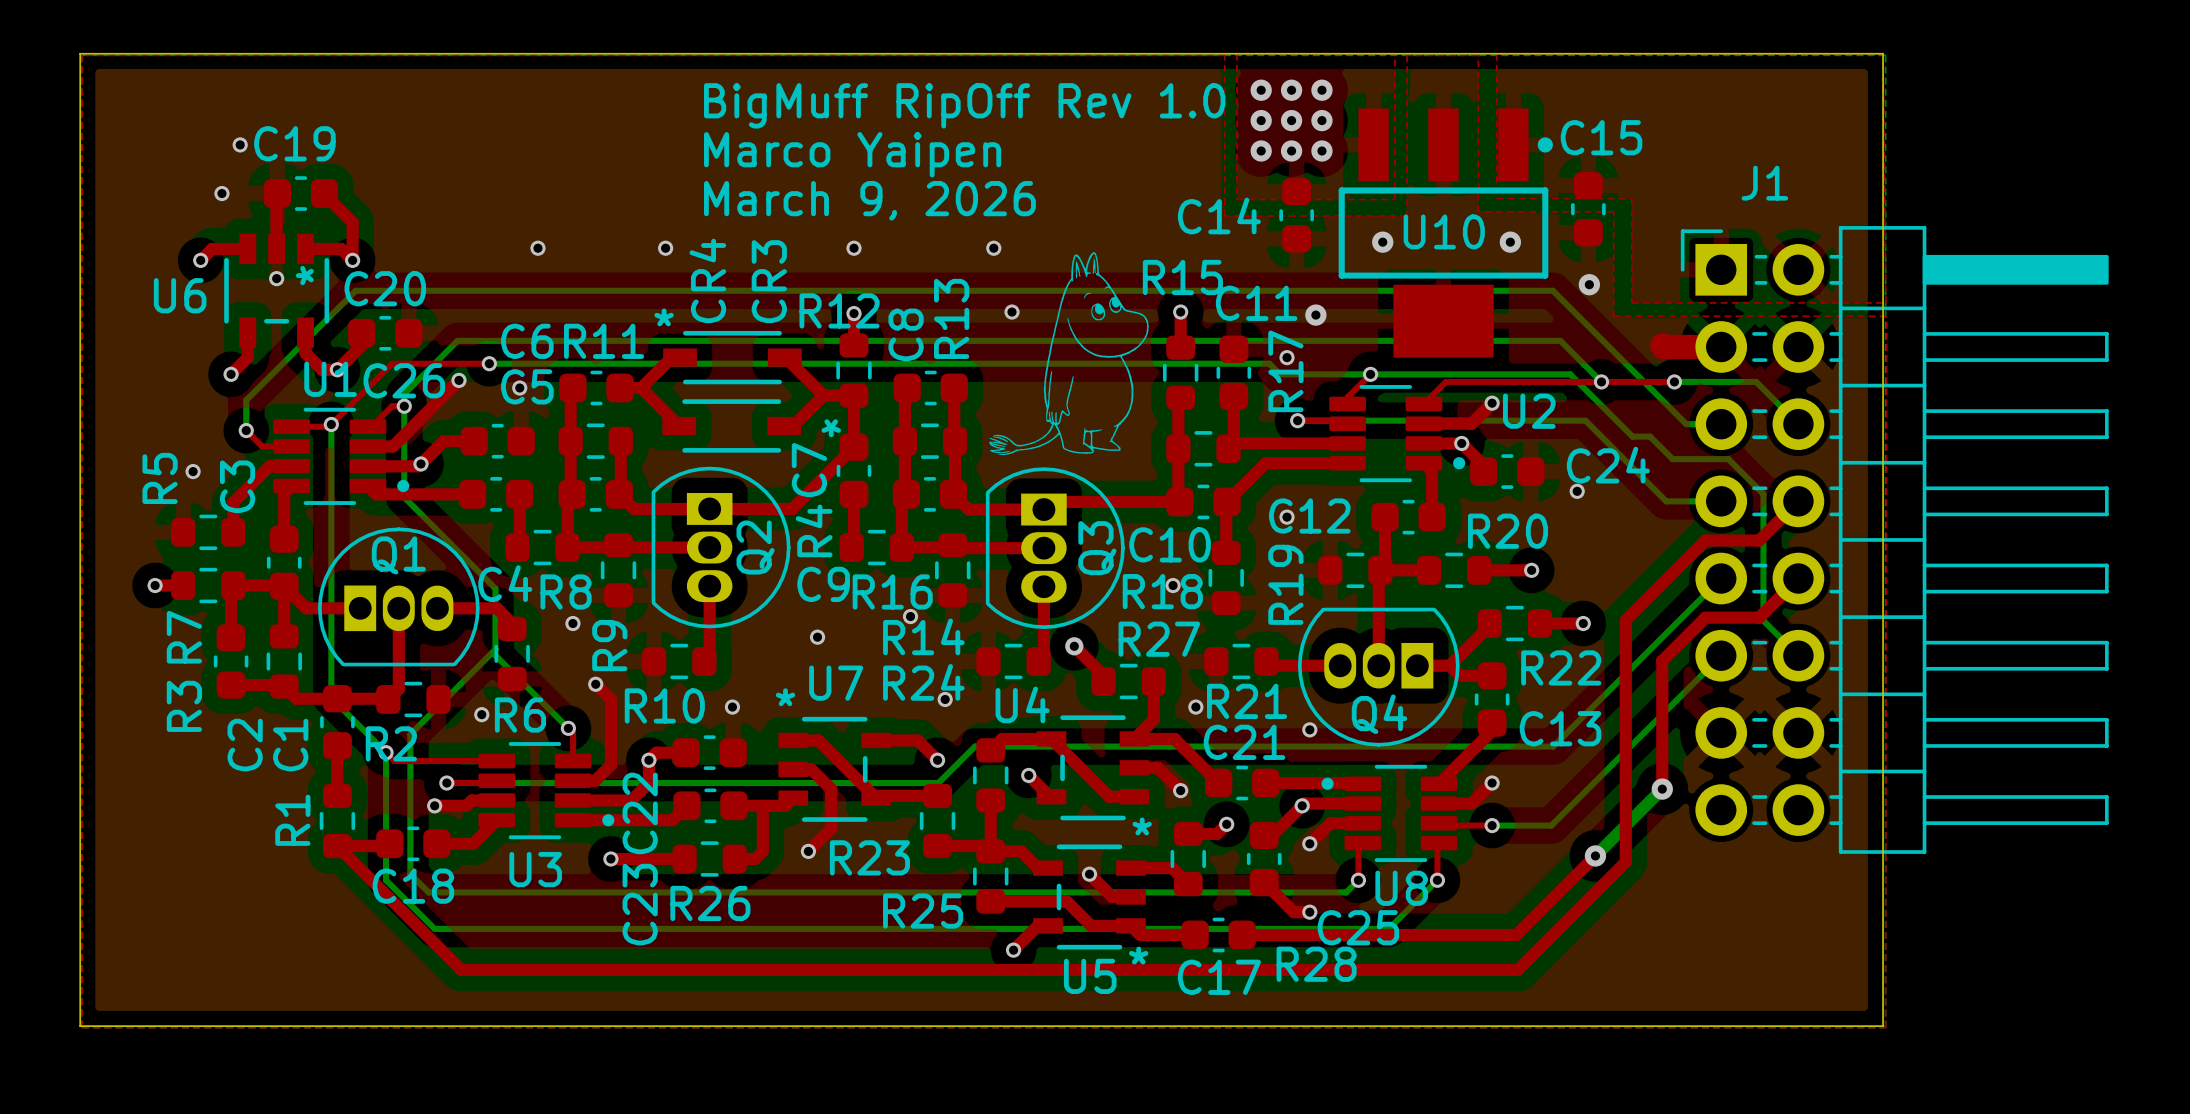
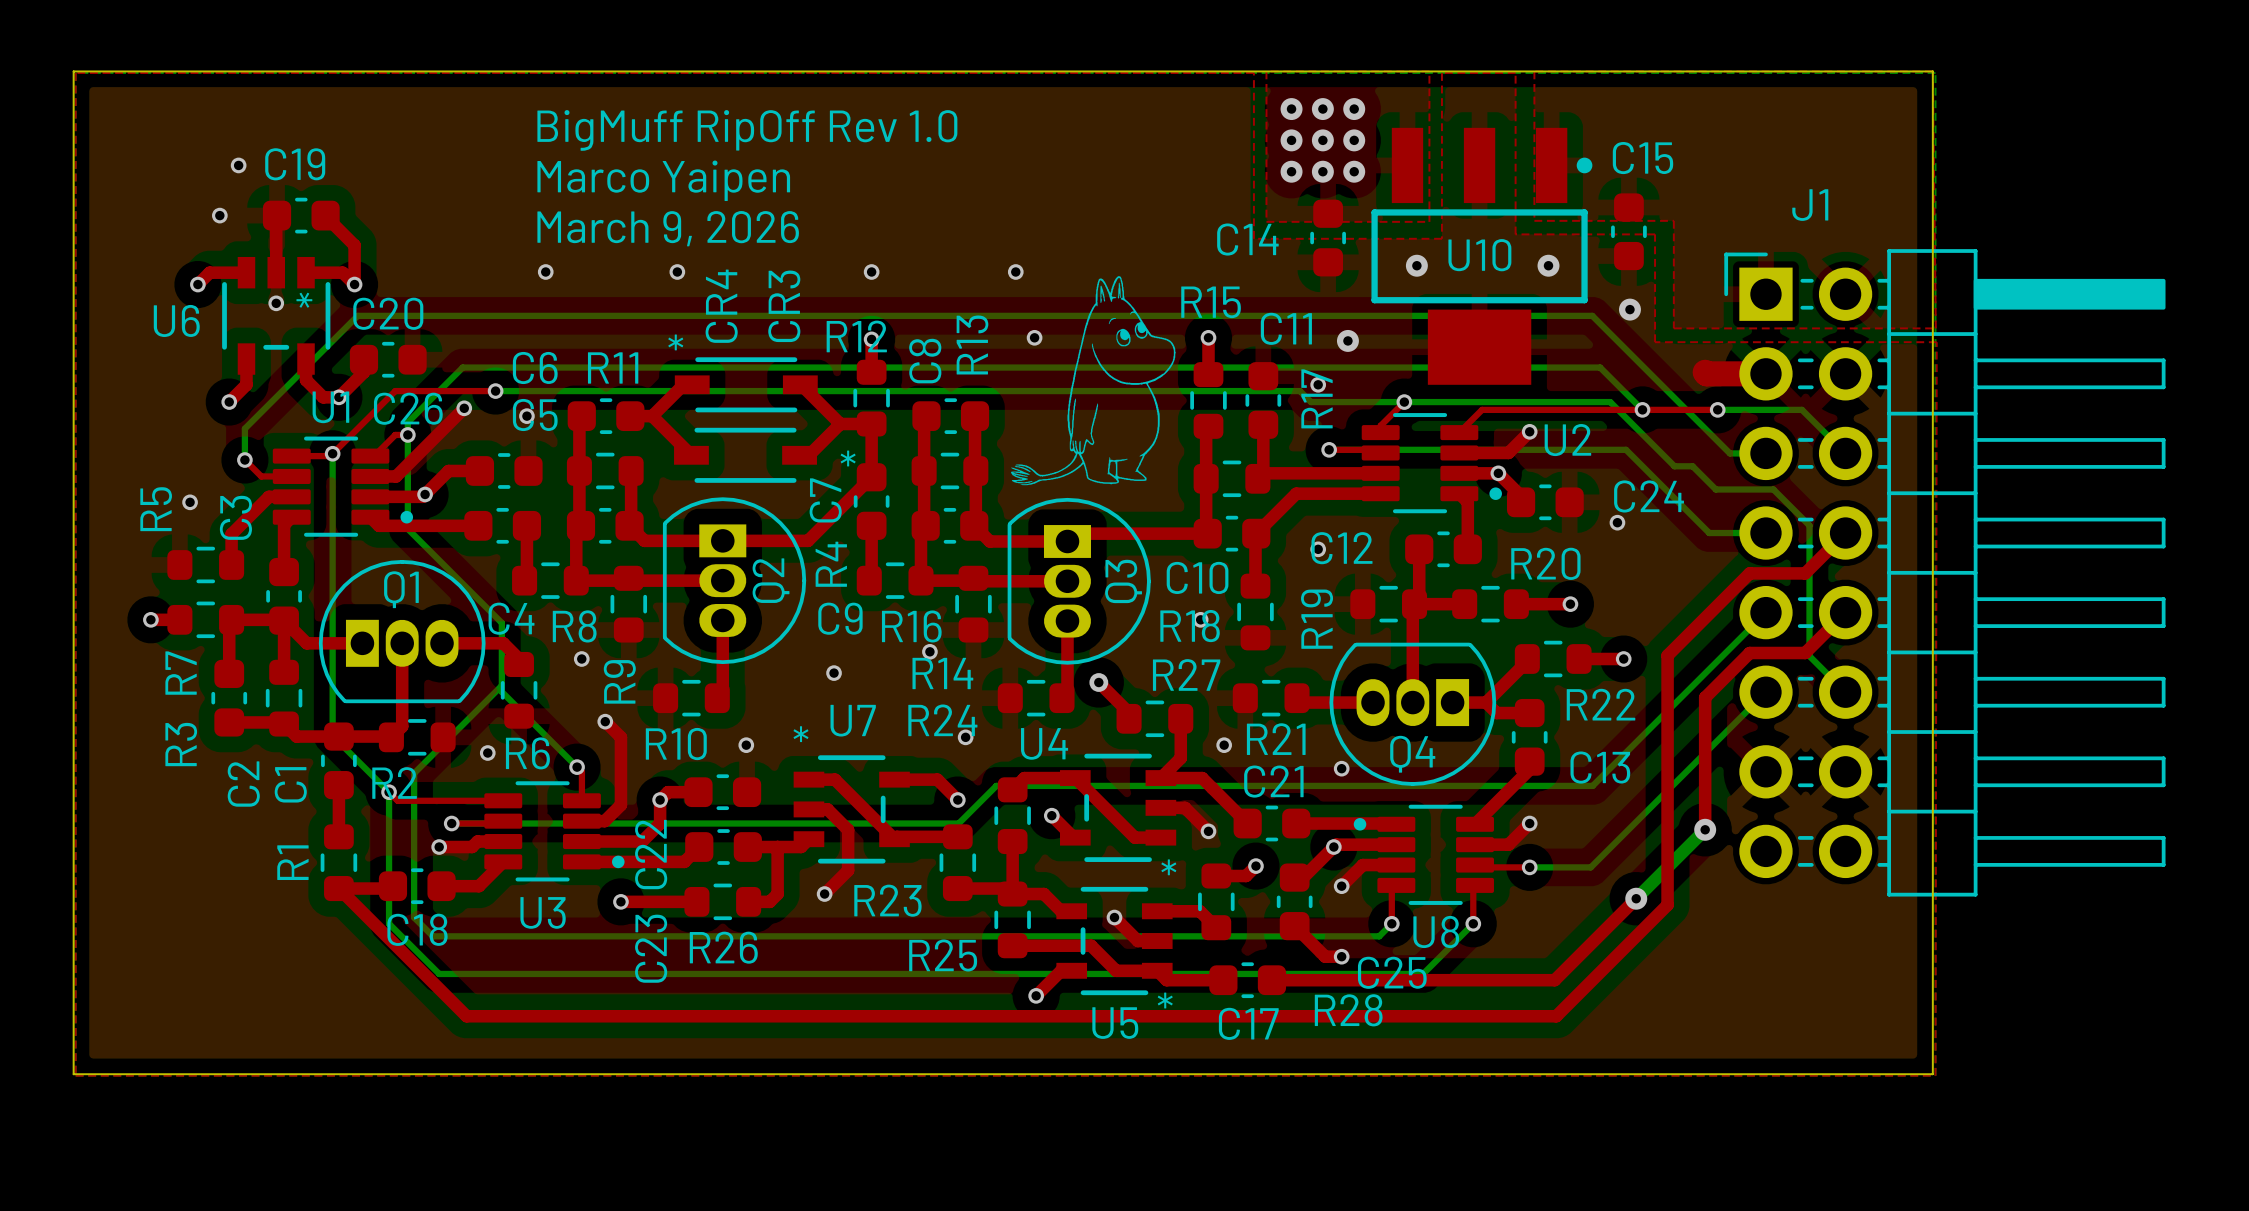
text position: BigMuff RipOff Rev 1.0 (964, 105) -> BigMuff RipOff Rev 1.0 (747, 130)
text position: Marco Yaipen (852, 154) -> Marco Yaipen (663, 180)
text position: March 9, 2026 (869, 200) -> March 9, 2026 (668, 228)

